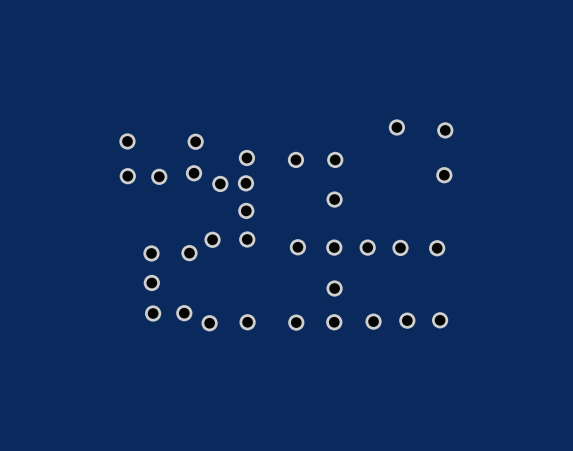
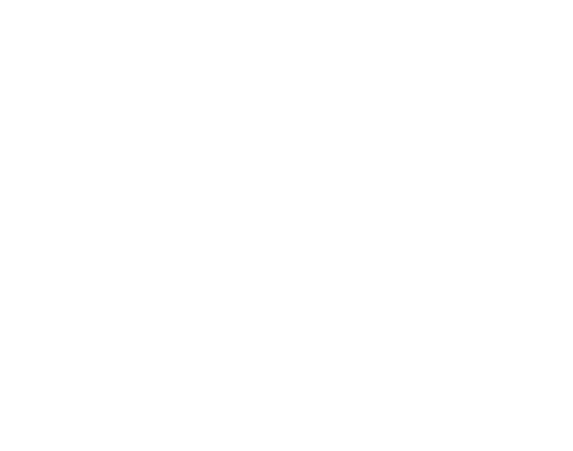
part: (396, 127) -> none
part: (445, 130) -> none
part: (127, 141) -> none
part: (195, 141) -> none
part: (246, 157) -> none
part: (295, 159) -> none
part: (335, 159) -> none
part: (194, 173) -> none
part: (444, 175) -> none
part: (127, 176) -> none
part: (159, 176) -> none
part: (220, 183) -> none
part: (245, 183) -> none
part: (334, 199) -> none
part: (246, 210) -> none
part: (212, 239) -> none
part: (247, 239) -> none
part: (297, 247) -> none
part: (334, 247) -> none
part: (367, 247) -> none
part: (400, 247) -> none
part: (437, 248) -> none
part: (151, 253) -> none
part: (189, 253) -> none
part: (151, 282) -> none
part: (334, 288) -> none
part: (153, 313) -> none
part: (184, 313) -> none
part: (407, 320) -> none
part: (440, 320) -> none
part: (373, 321) -> none
part: (247, 322) -> none
part: (296, 322) -> none
part: (334, 322) -> none
part: (209, 323) -> none

